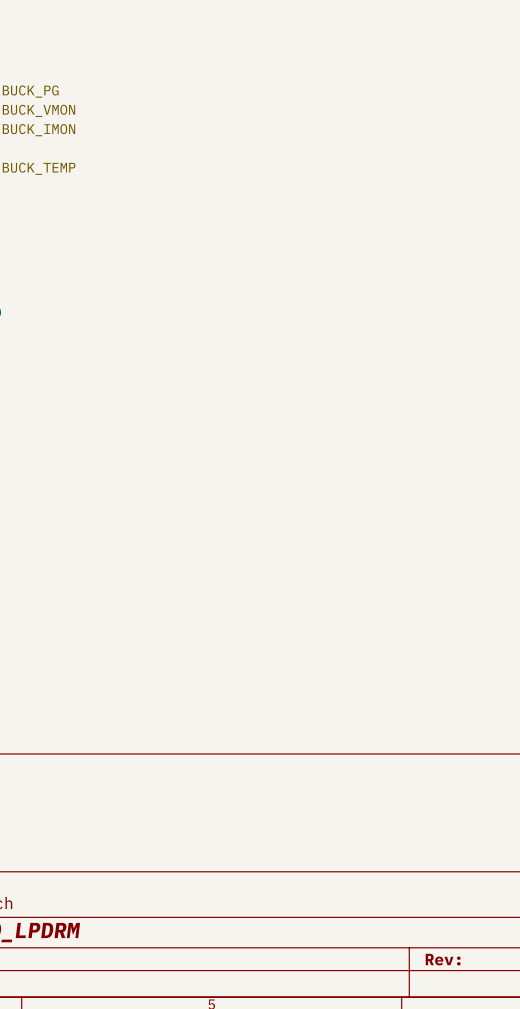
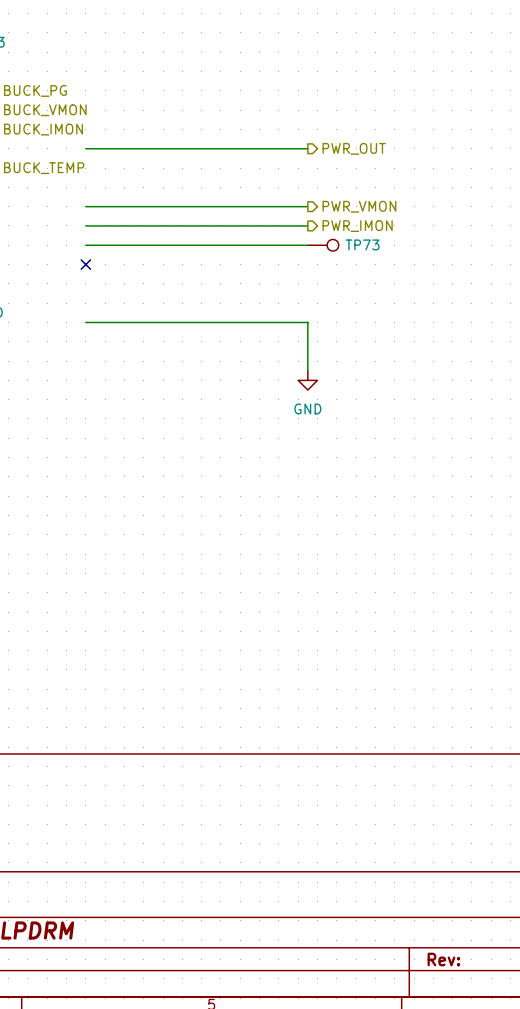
wire: none -> (85, 148) (307, 148)
hierarchical label: none -> PWR_OUT (354, 148)
wire: none -> (85, 206) (307, 206)
hierarchical label: none -> PWR_VMON (359, 206)
wire: none -> (85, 225) (307, 225)
hierarchical label: none -> PWR_IMON (357, 226)
wire: none -> (85, 245) (307, 245)
TP73: none -> (323, 245)
no-connect mark: none -> (85, 264)
wire: none -> (85, 322) (307, 322) (307, 370)
power symbol: none -> GND (307, 380)

